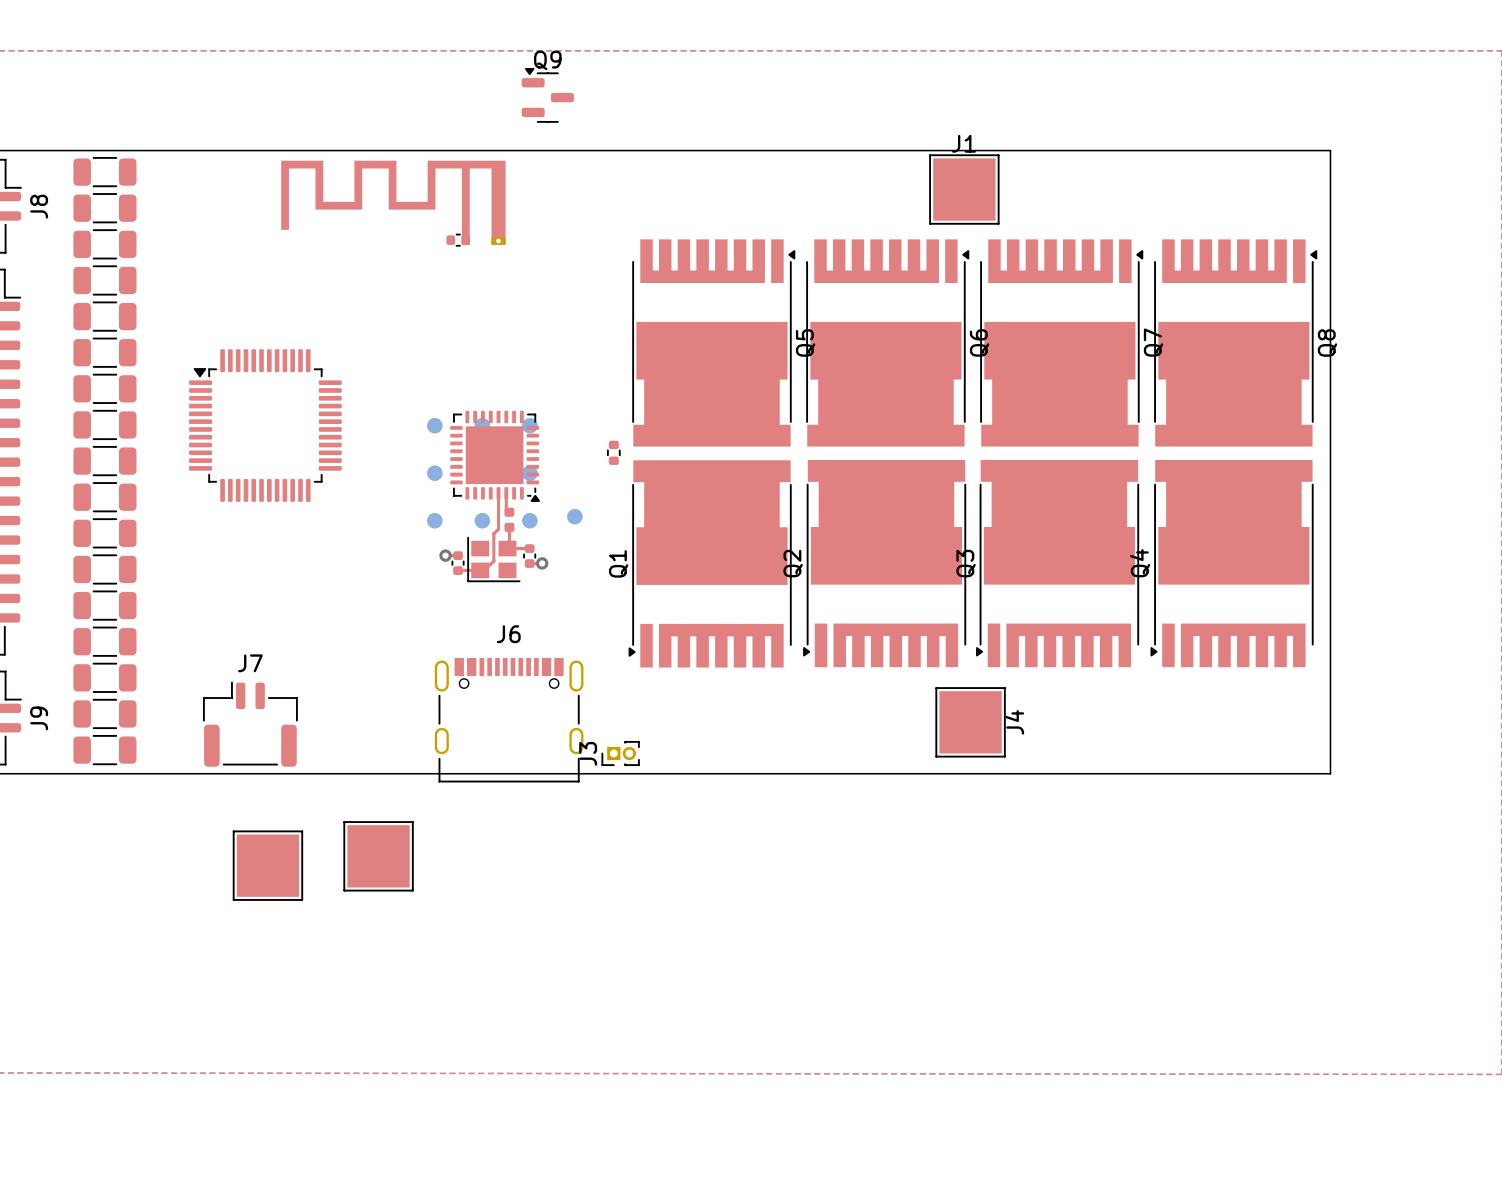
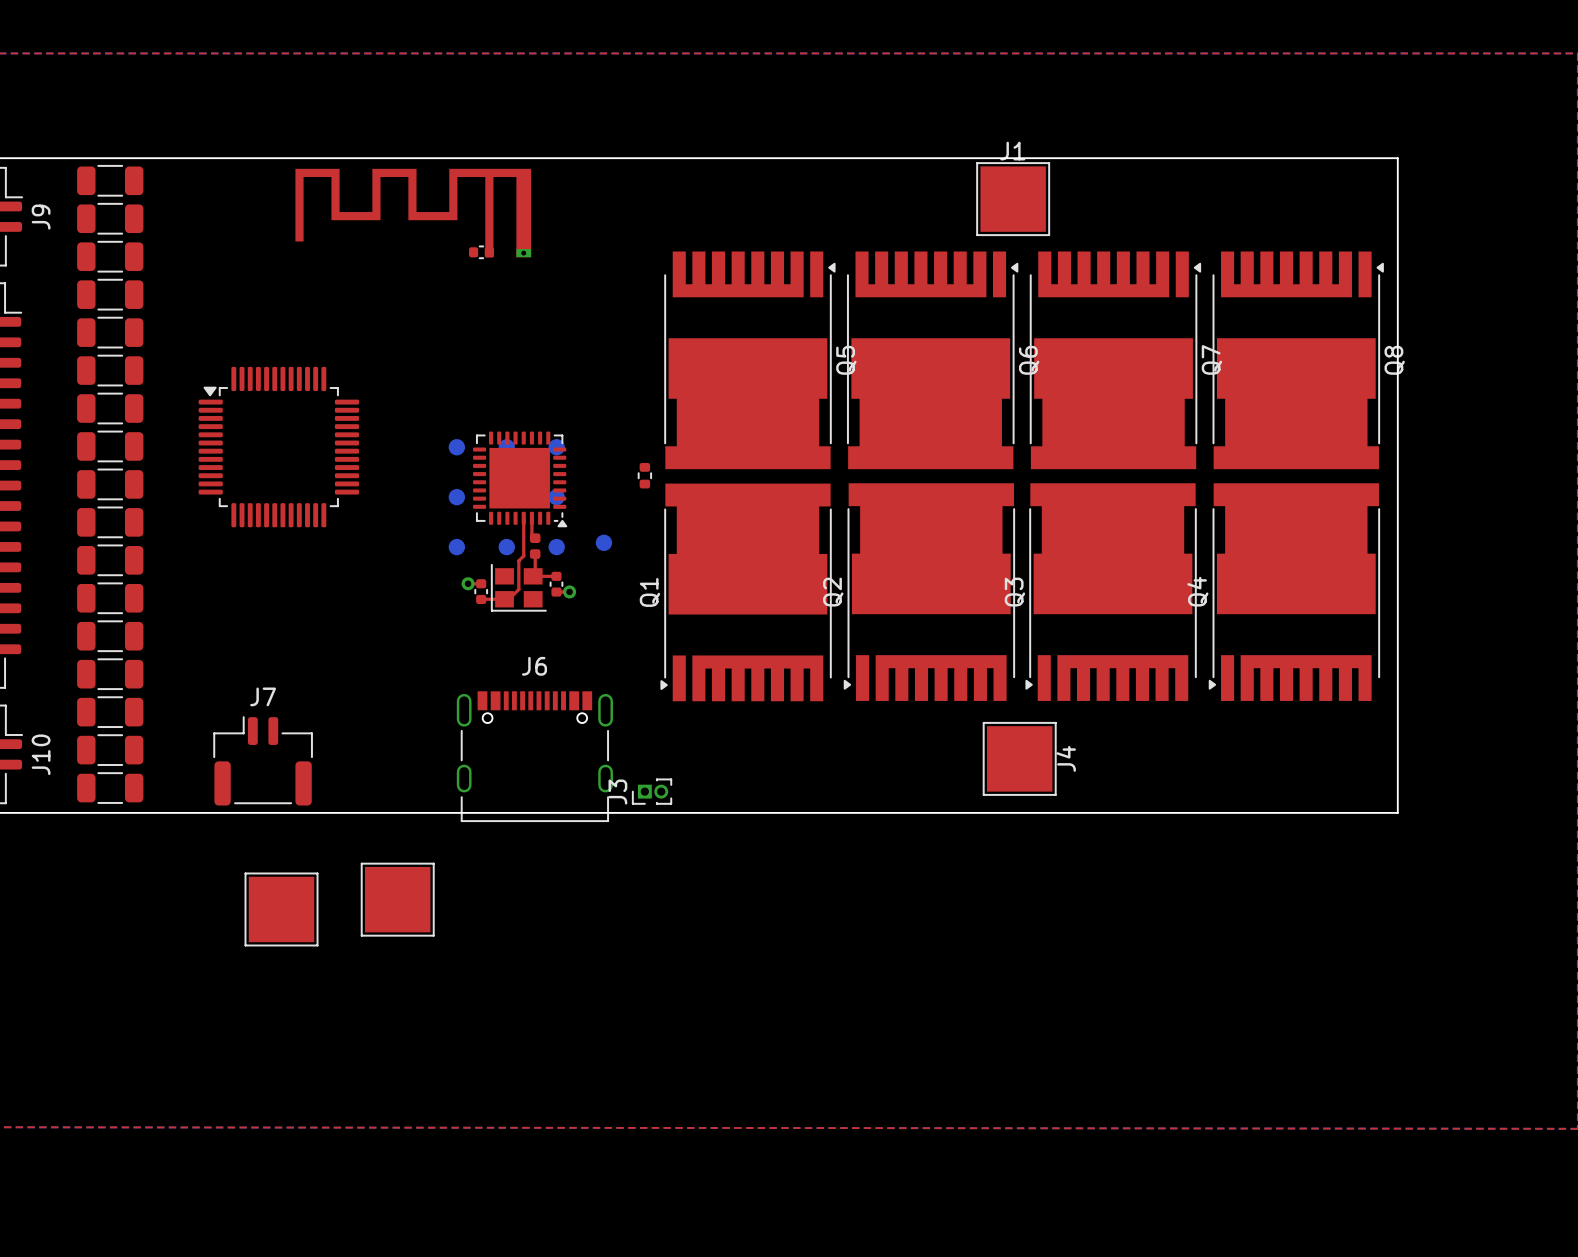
Q9: (547, 95) -> none
J8 name: J8 (39, 206) -> J9 (41, 217)
J9 name: J9 (39, 718) -> J10 (41, 754)

